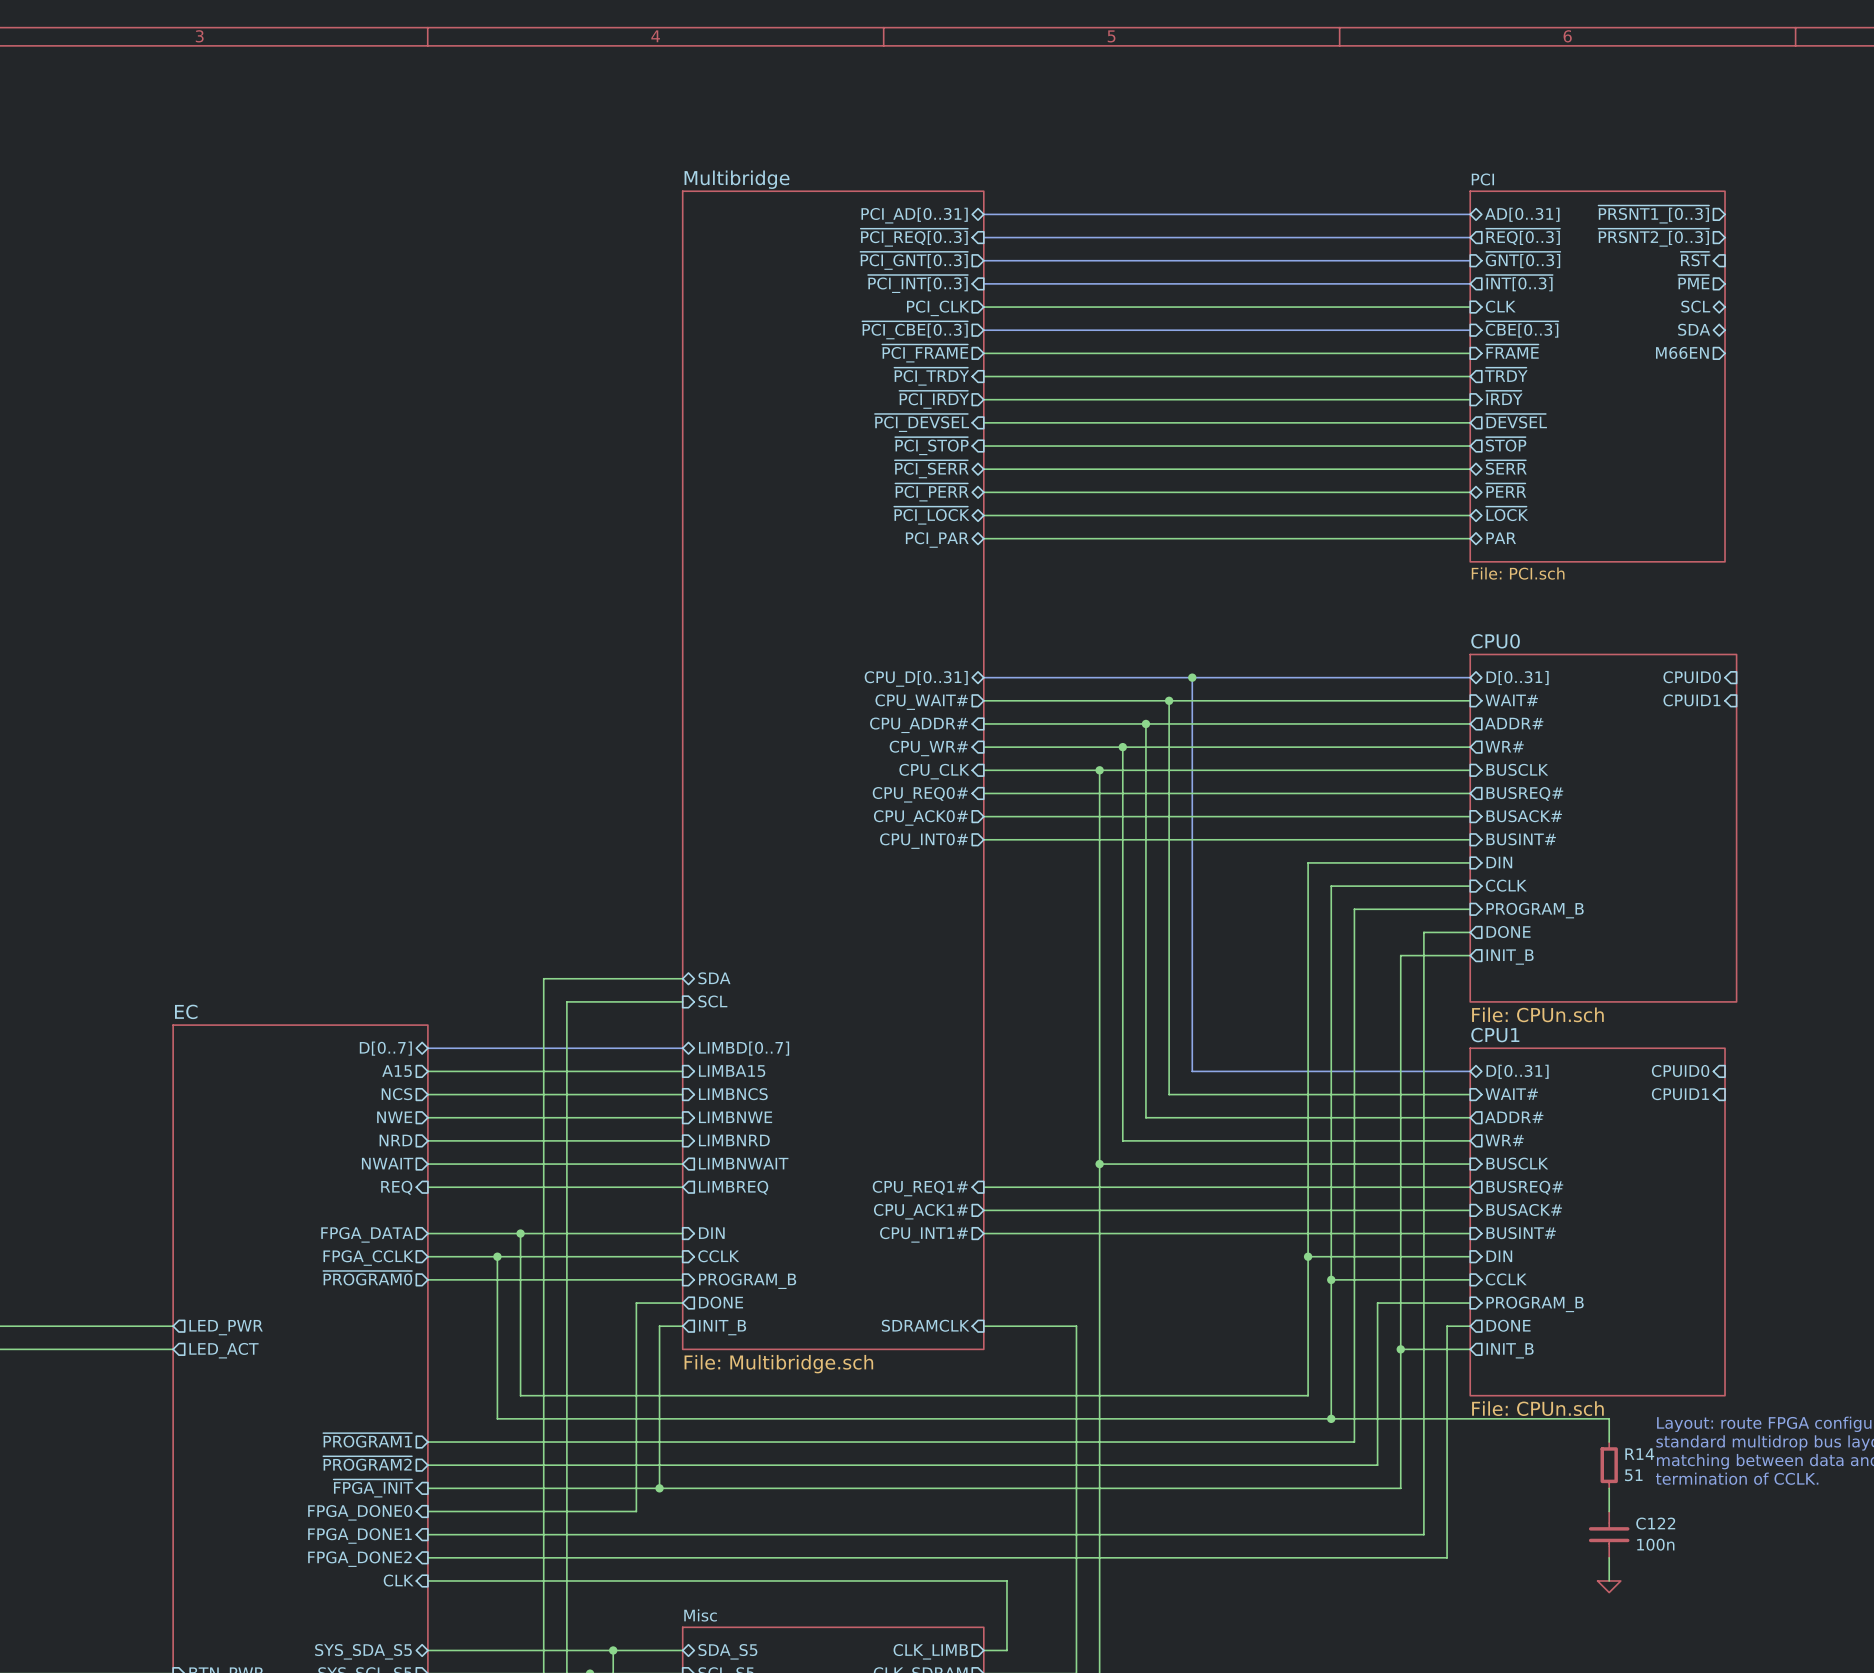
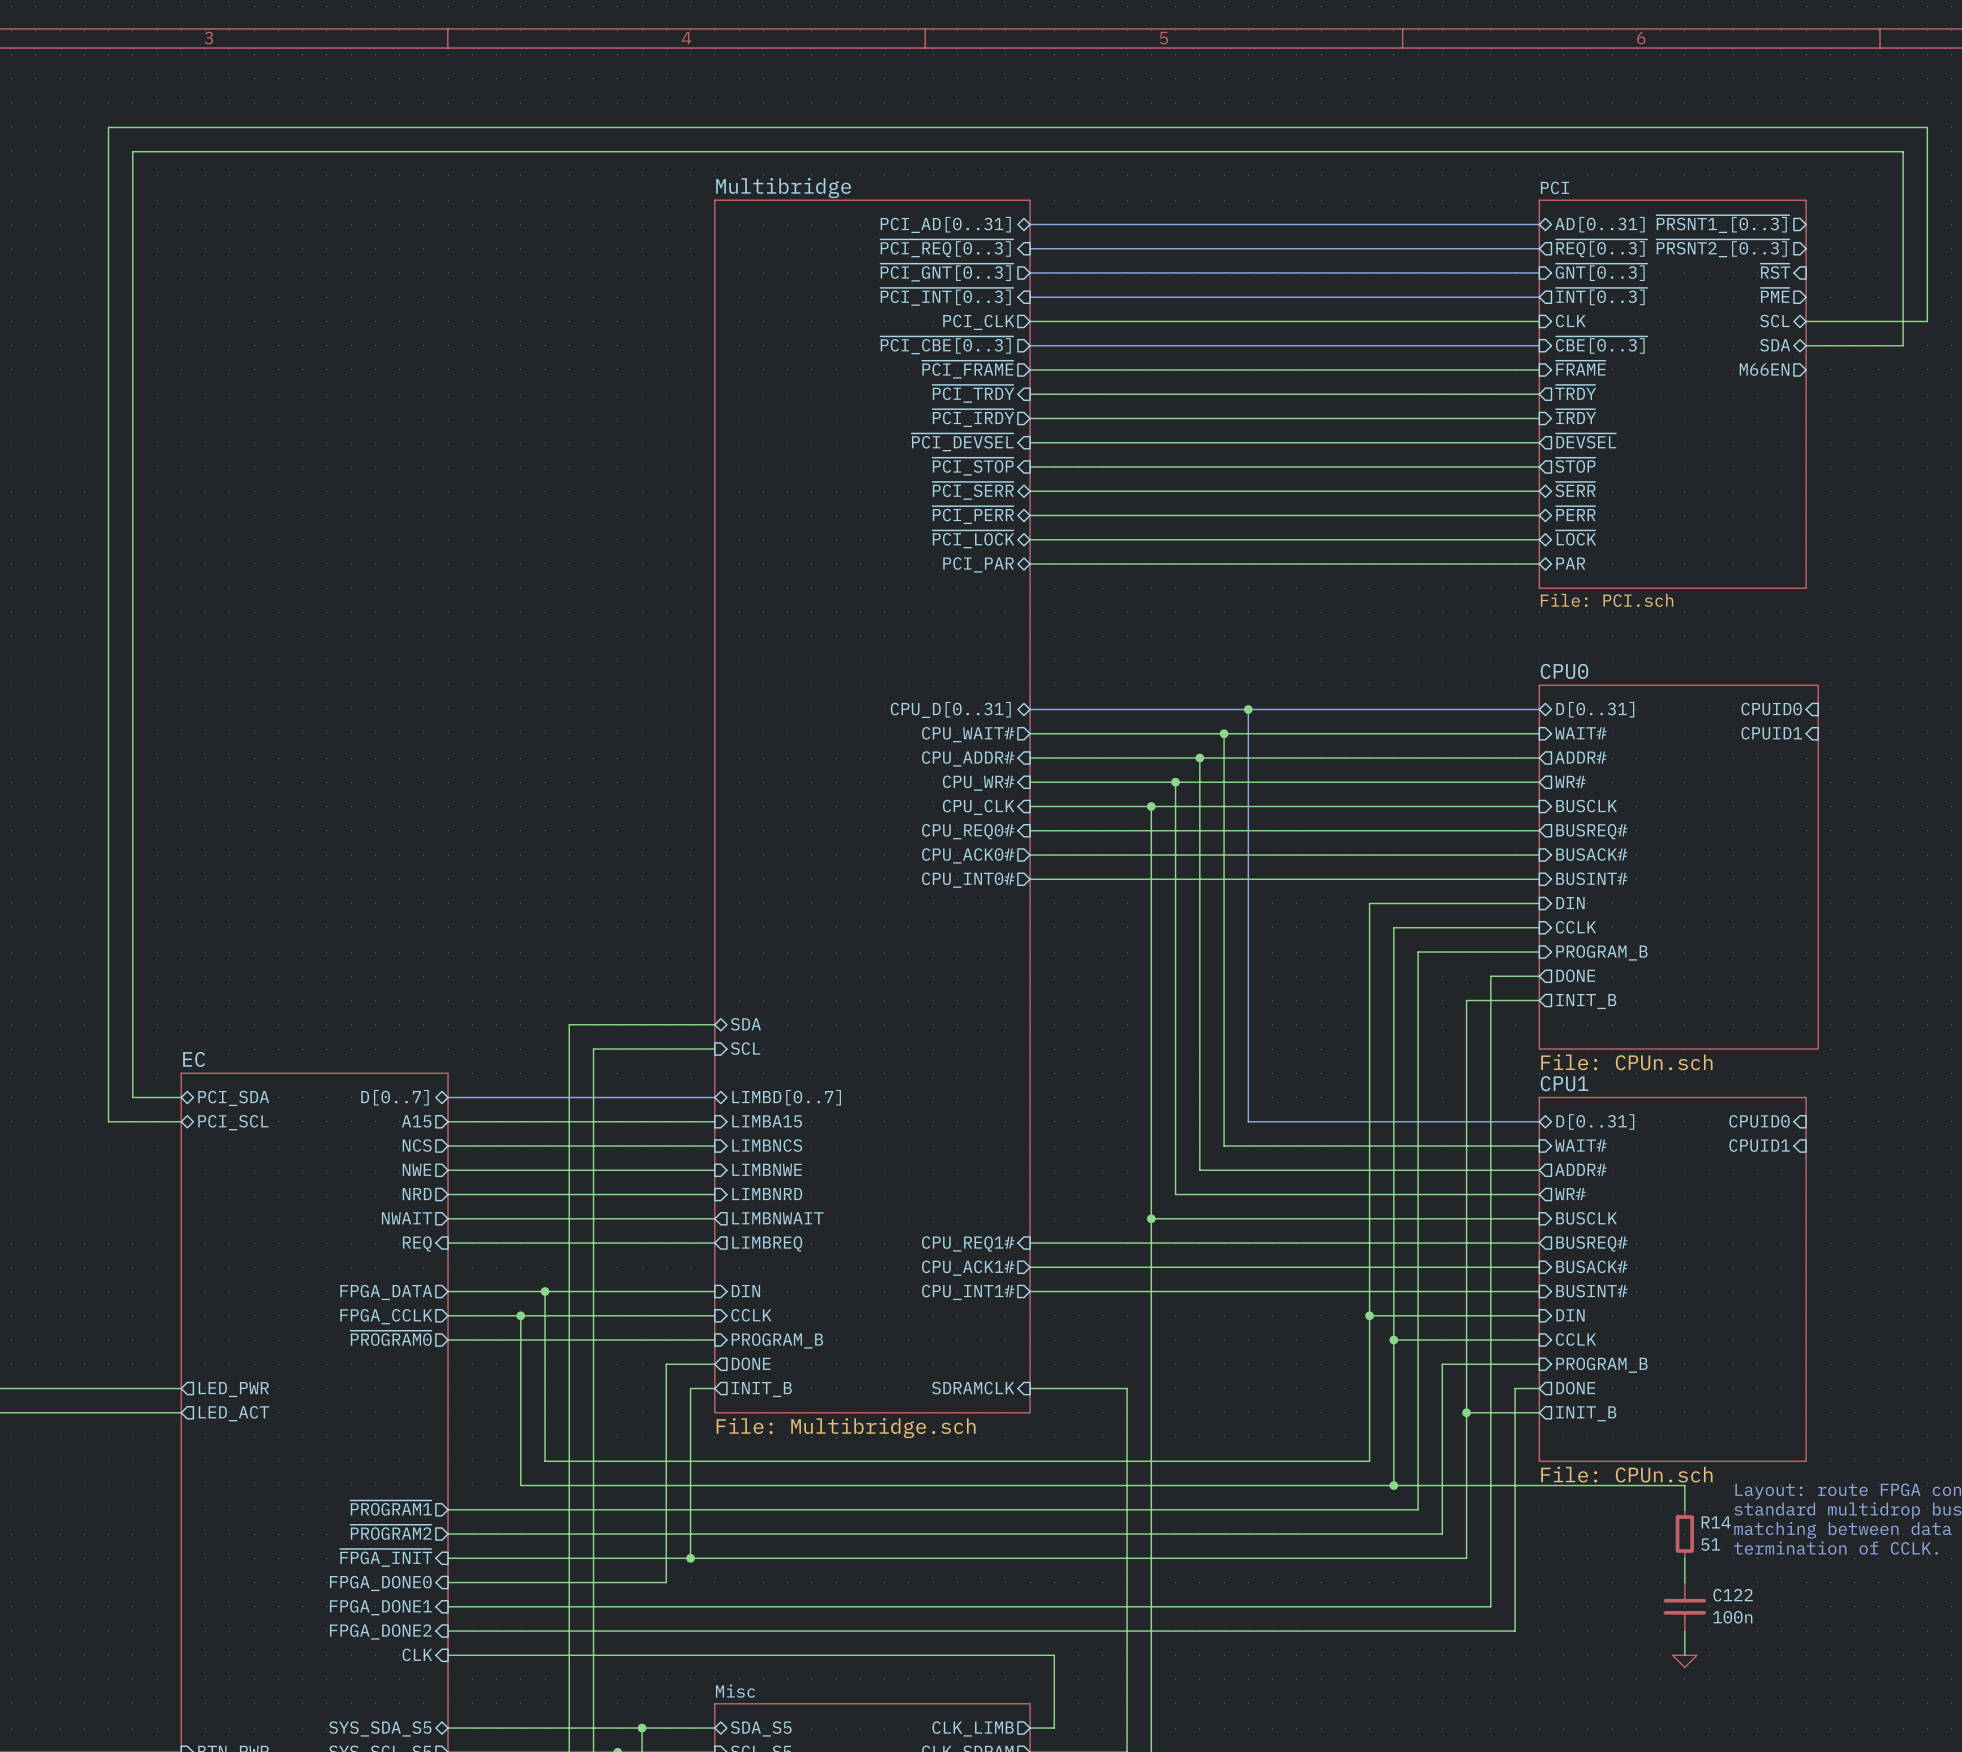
wire: none -> (1806, 321) (1927, 321) (1927, 127) (108, 127) (108, 1121) (181, 1121)
wire: none -> (1806, 345) (1903, 345) (1903, 151) (132, 151) (132, 1097) (181, 1097)
sheet pin: none -> PCI_SDA (233, 1098)
sheet pin: none -> PCI_SCL (233, 1122)

